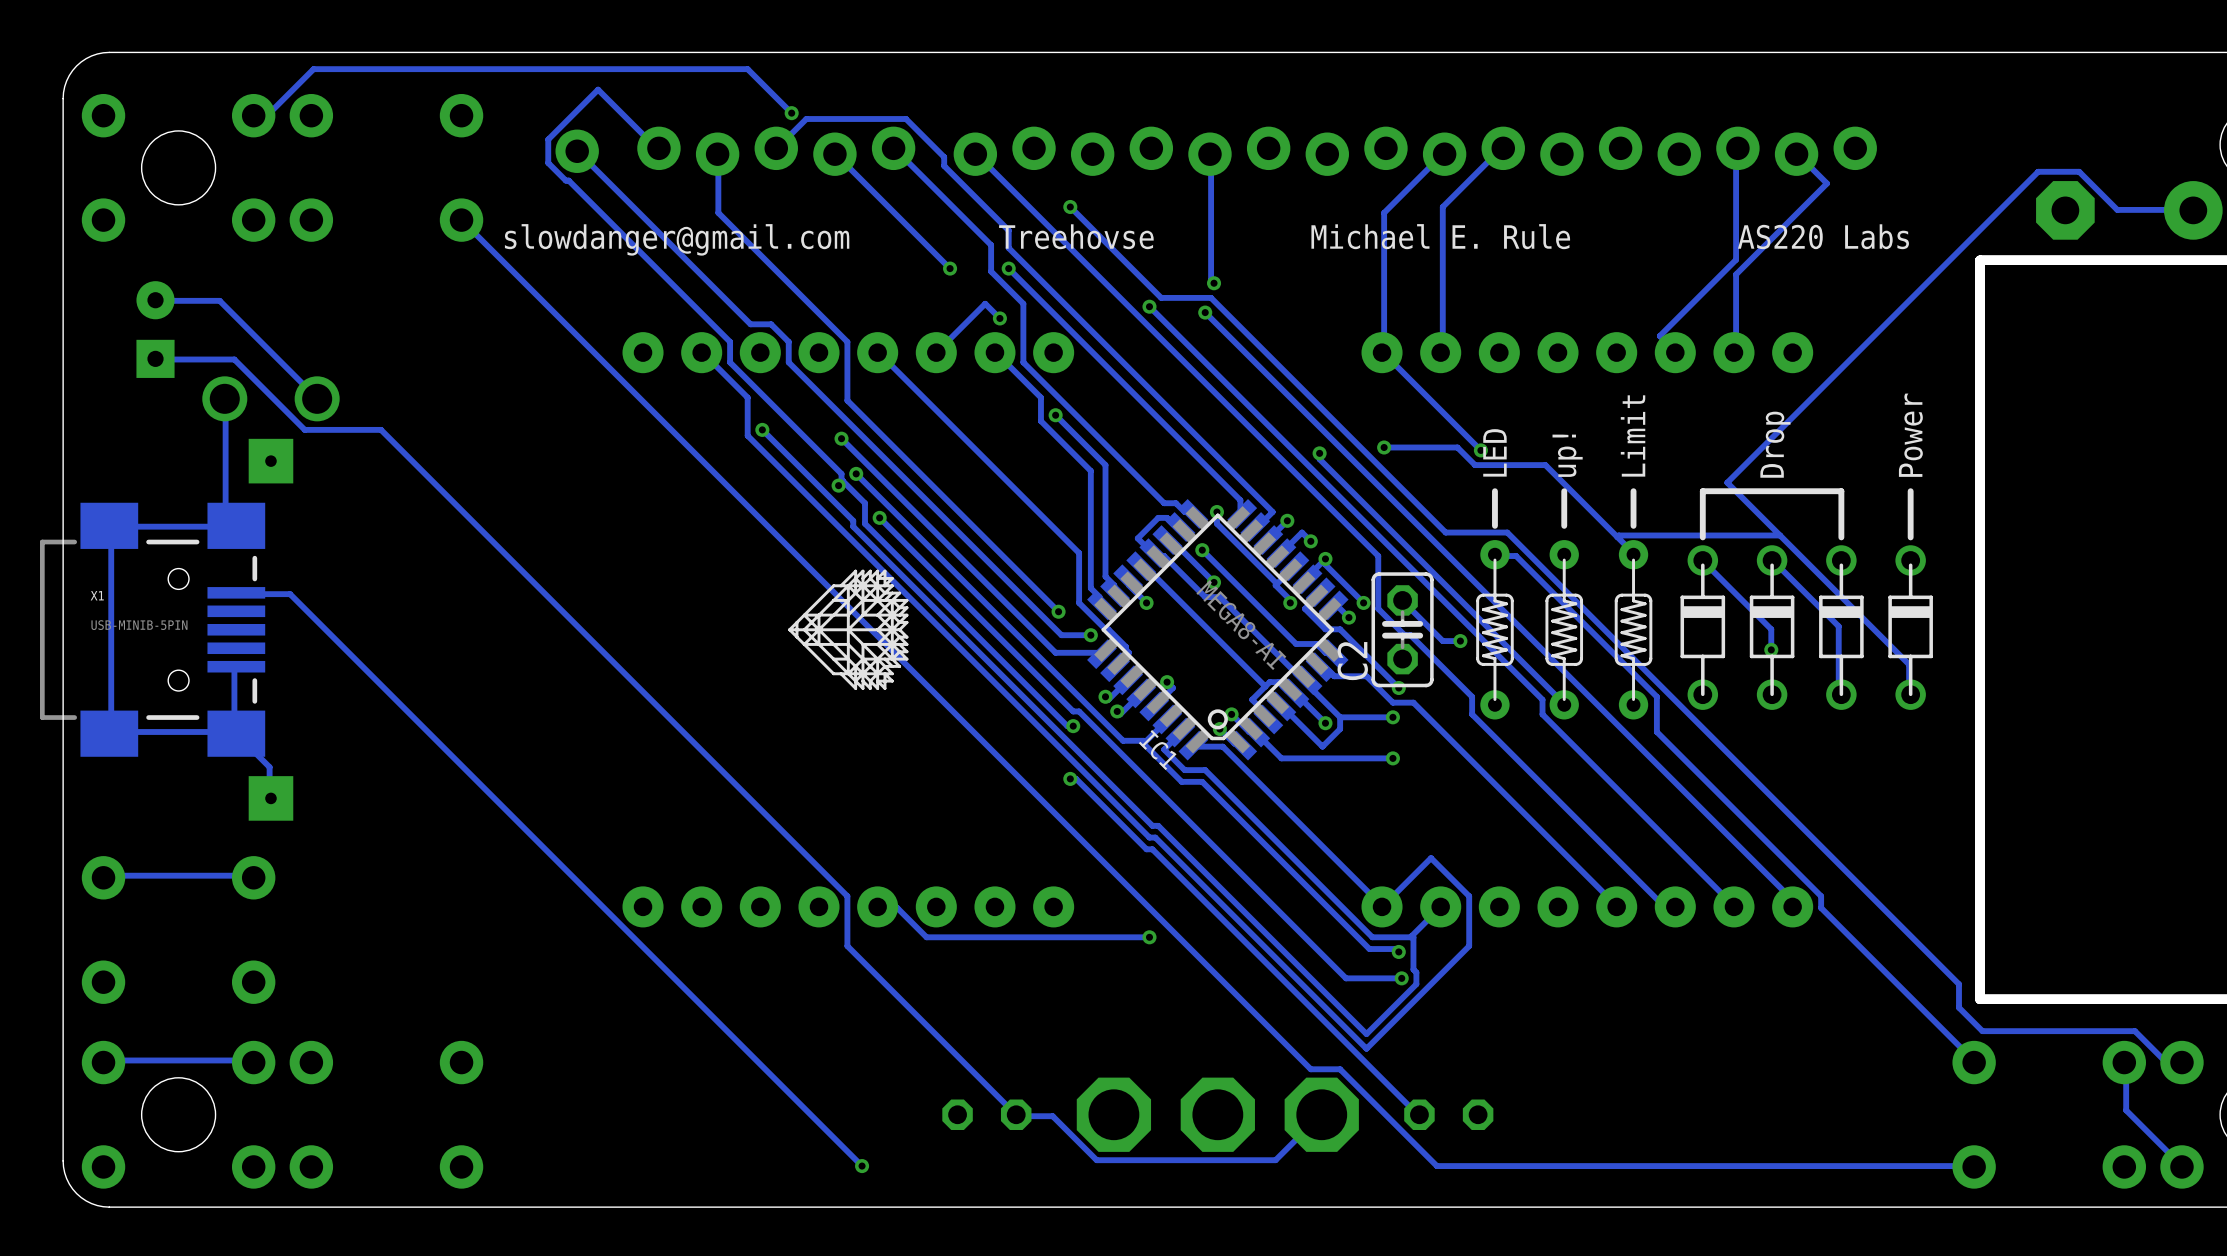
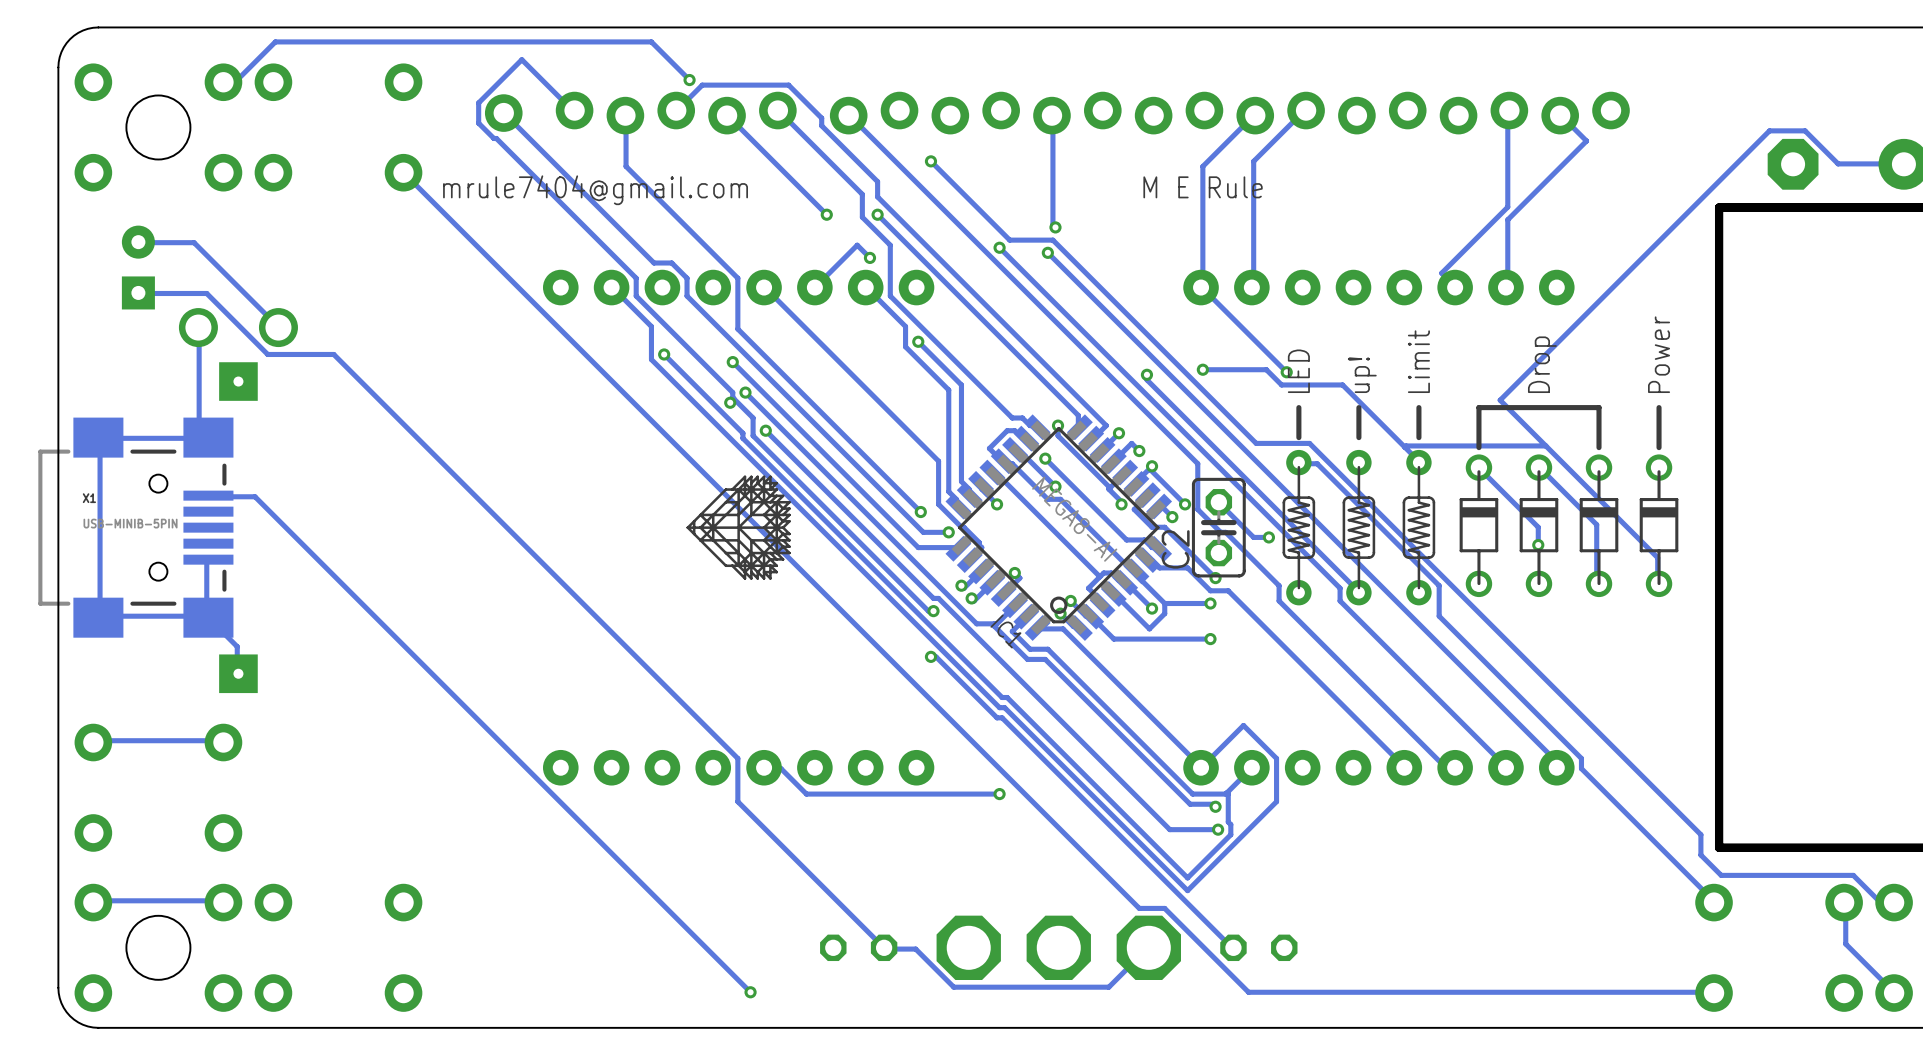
text: Treehovse (1076, 236) -> none
text: Michael E. Rule (1440, 236) -> M E Rule (1203, 187)
text: AS220 Labs (1823, 236) -> none
text: slowdanger@gmail.com (677, 239) -> mrule7404@gmail.com (595, 190)

